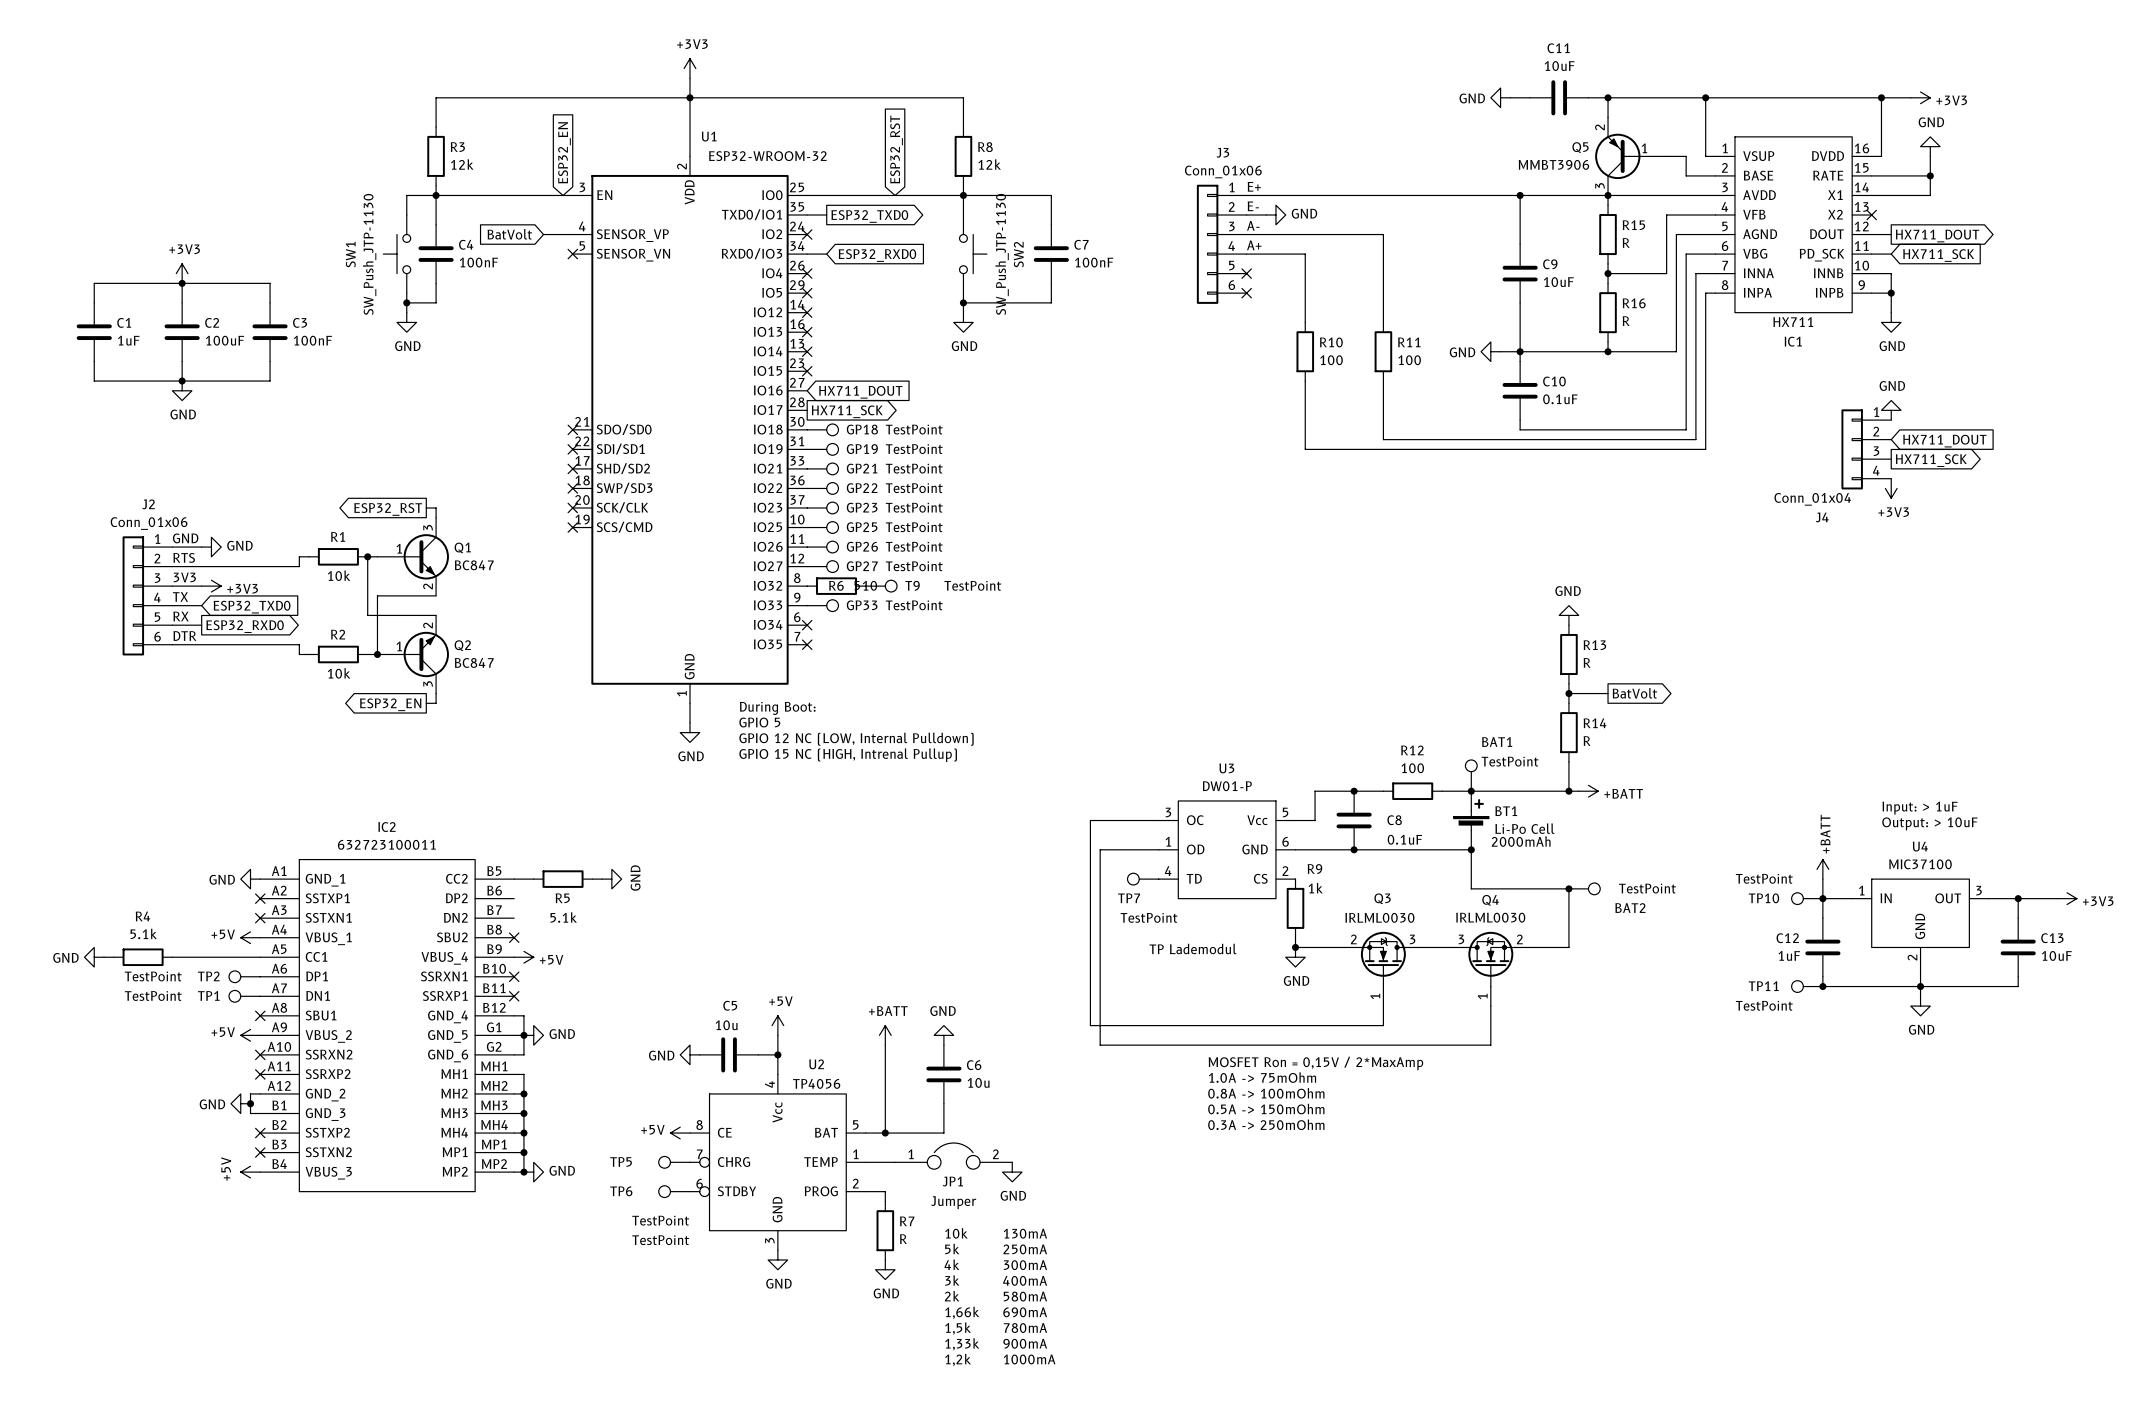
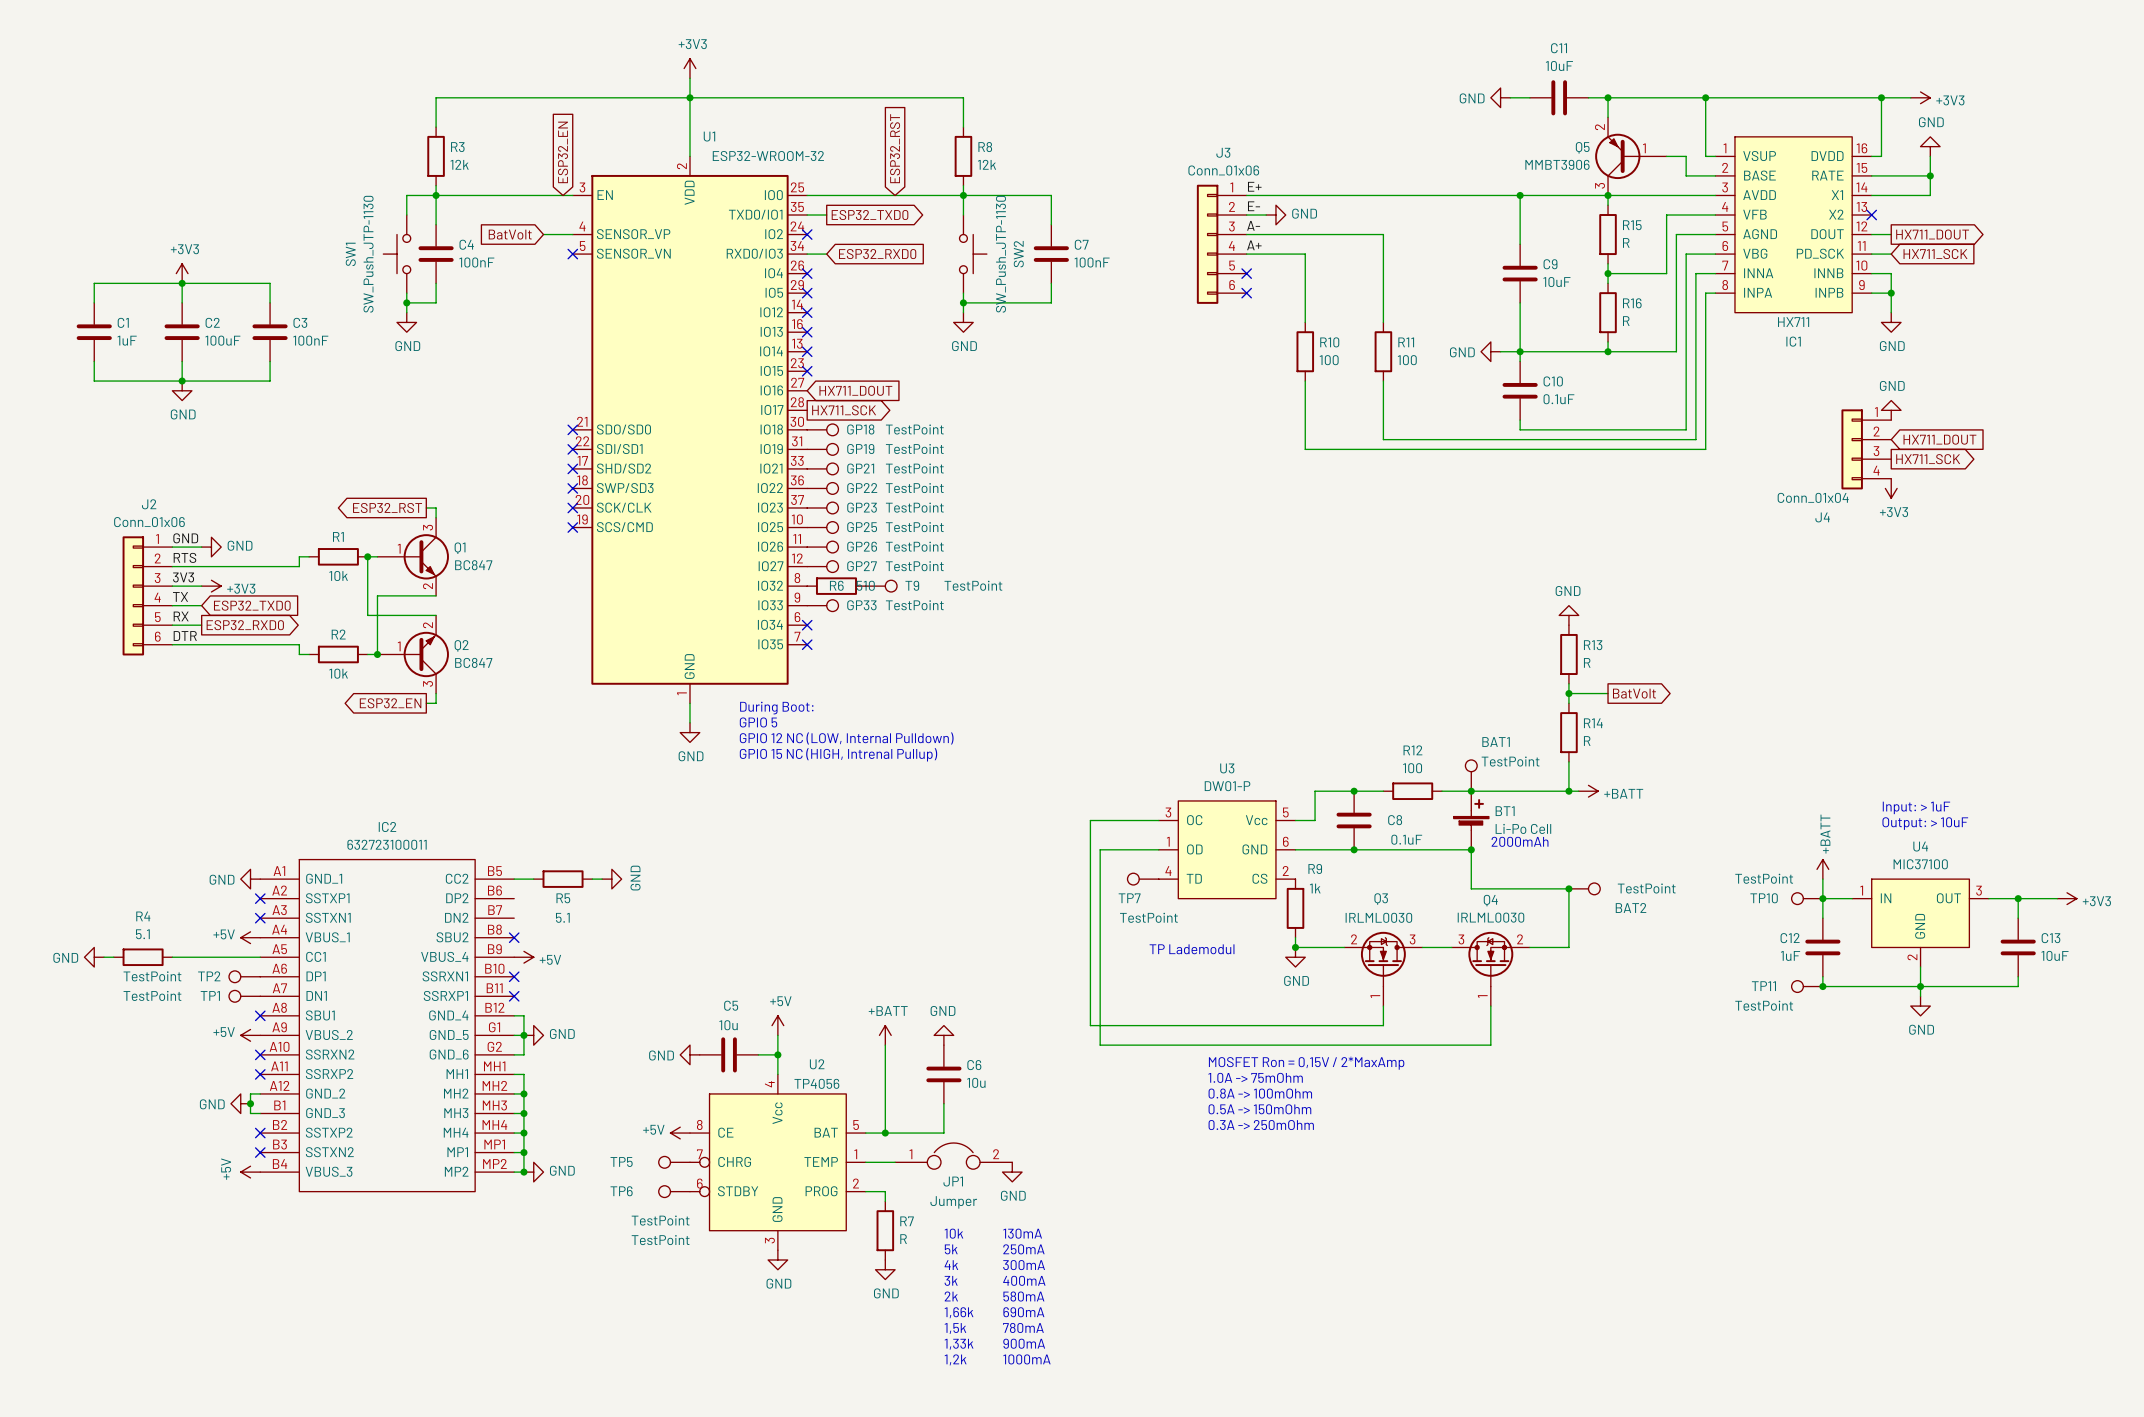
R5 value: 5.1k (563, 917) -> 5.1 (562, 917)
R4 value: 5.1k (143, 933) -> 5.1 (142, 934)

